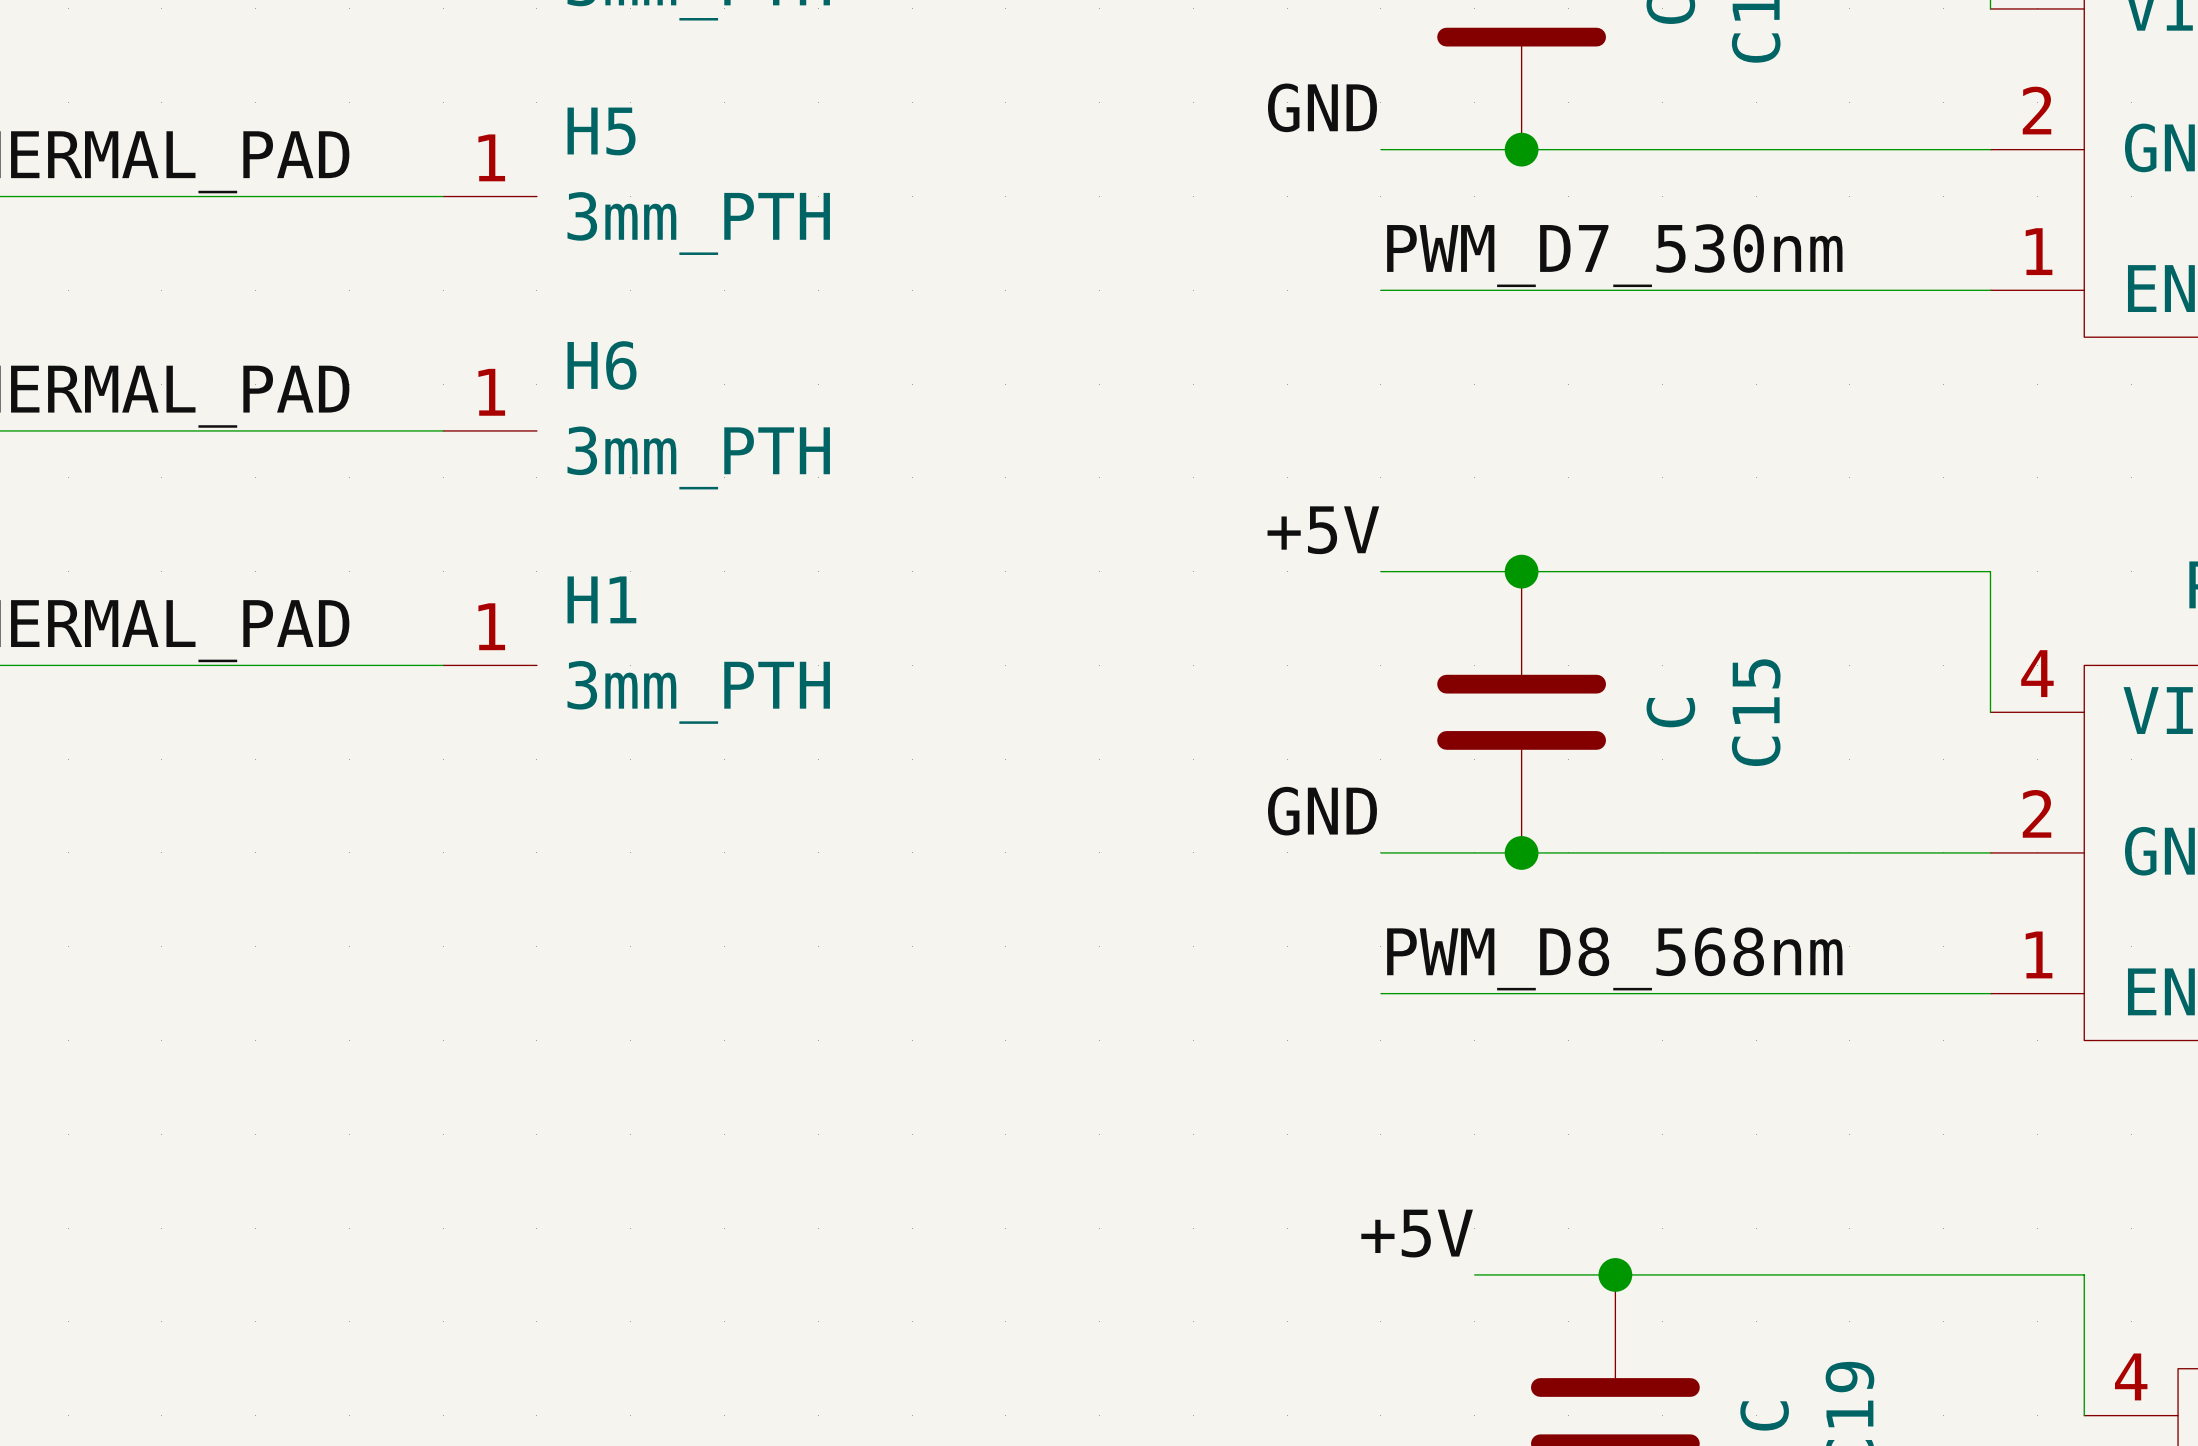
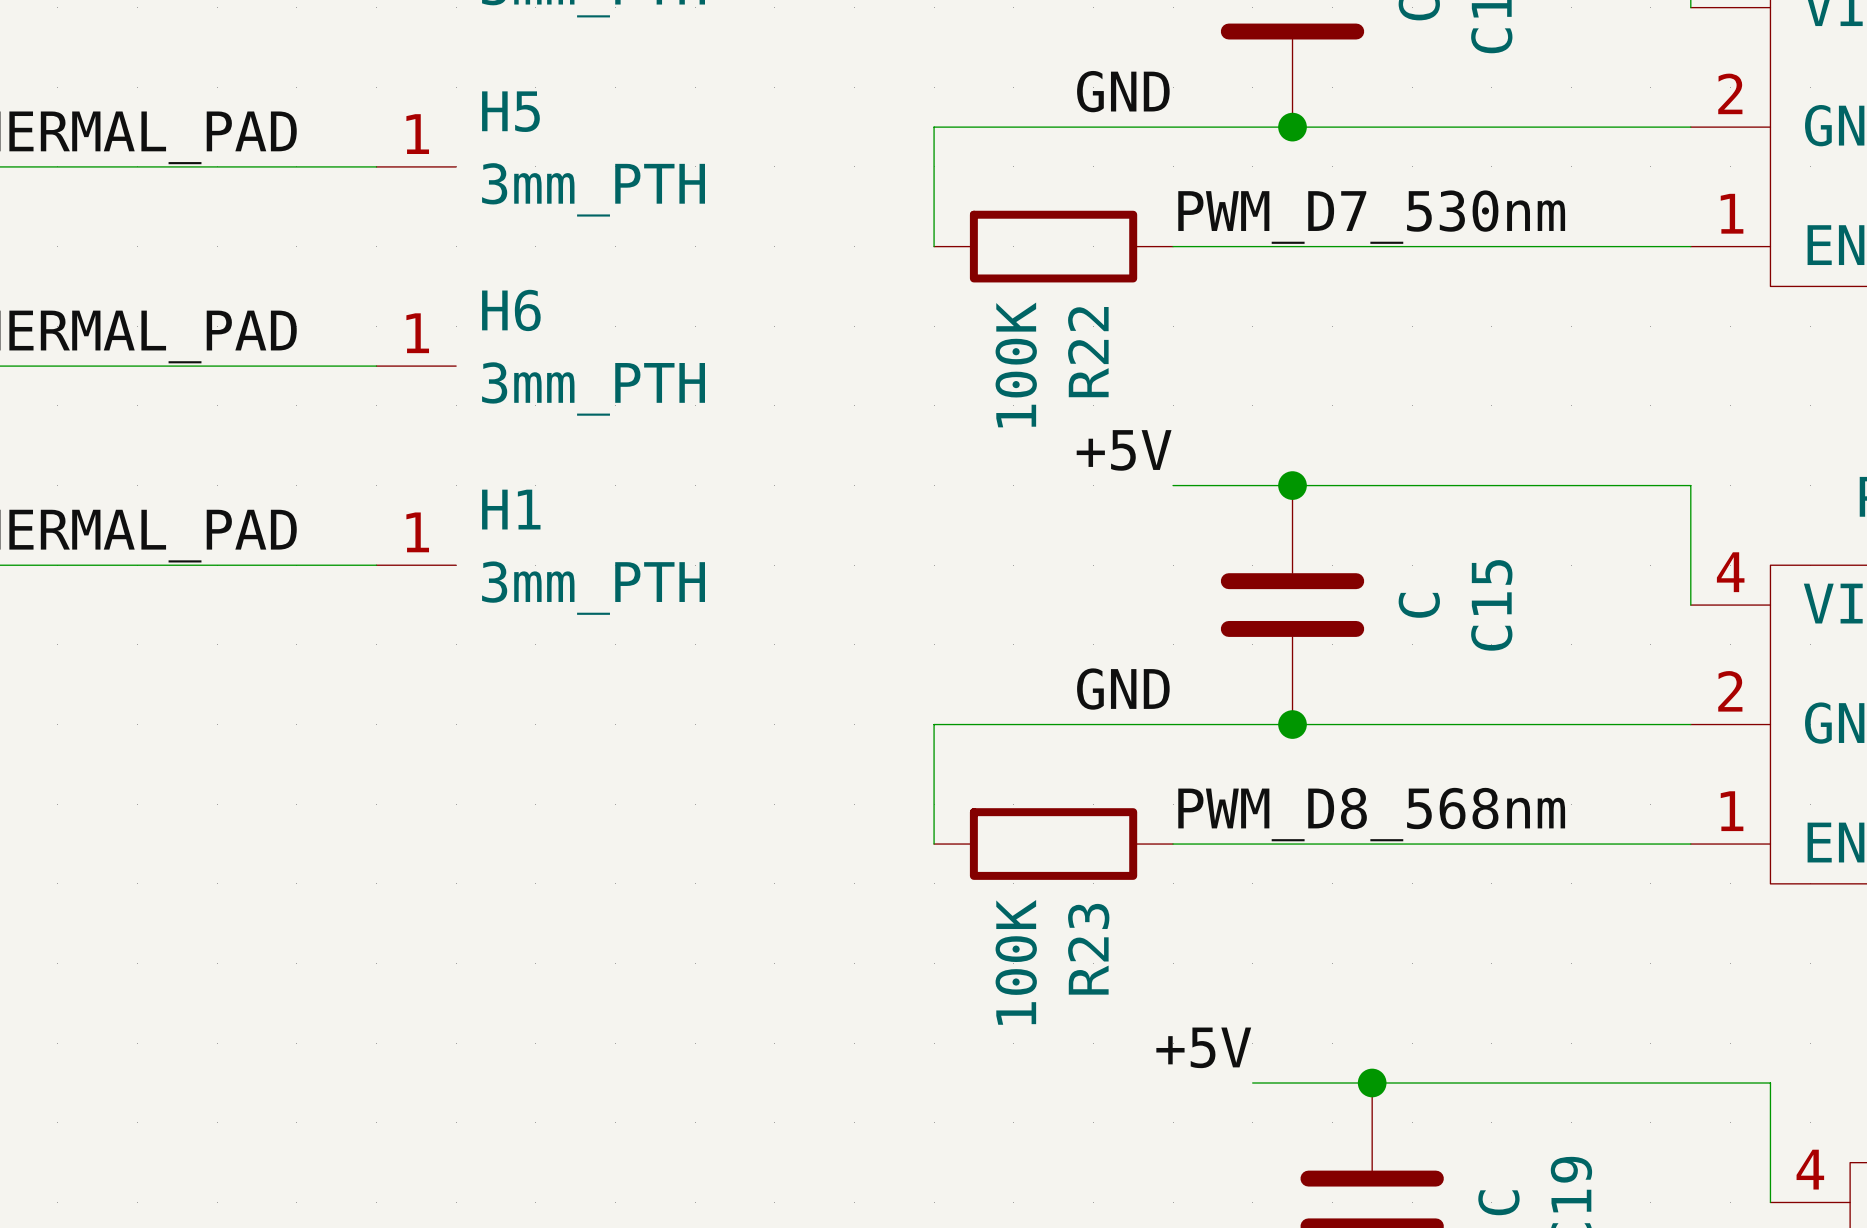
wire: none -> (1173, 127) (934, 127) (934, 246)
R22: none -> 100K (1053, 246)
wire: none -> (1173, 724) (934, 724) (934, 844)
R23: none -> 100K (1053, 844)

